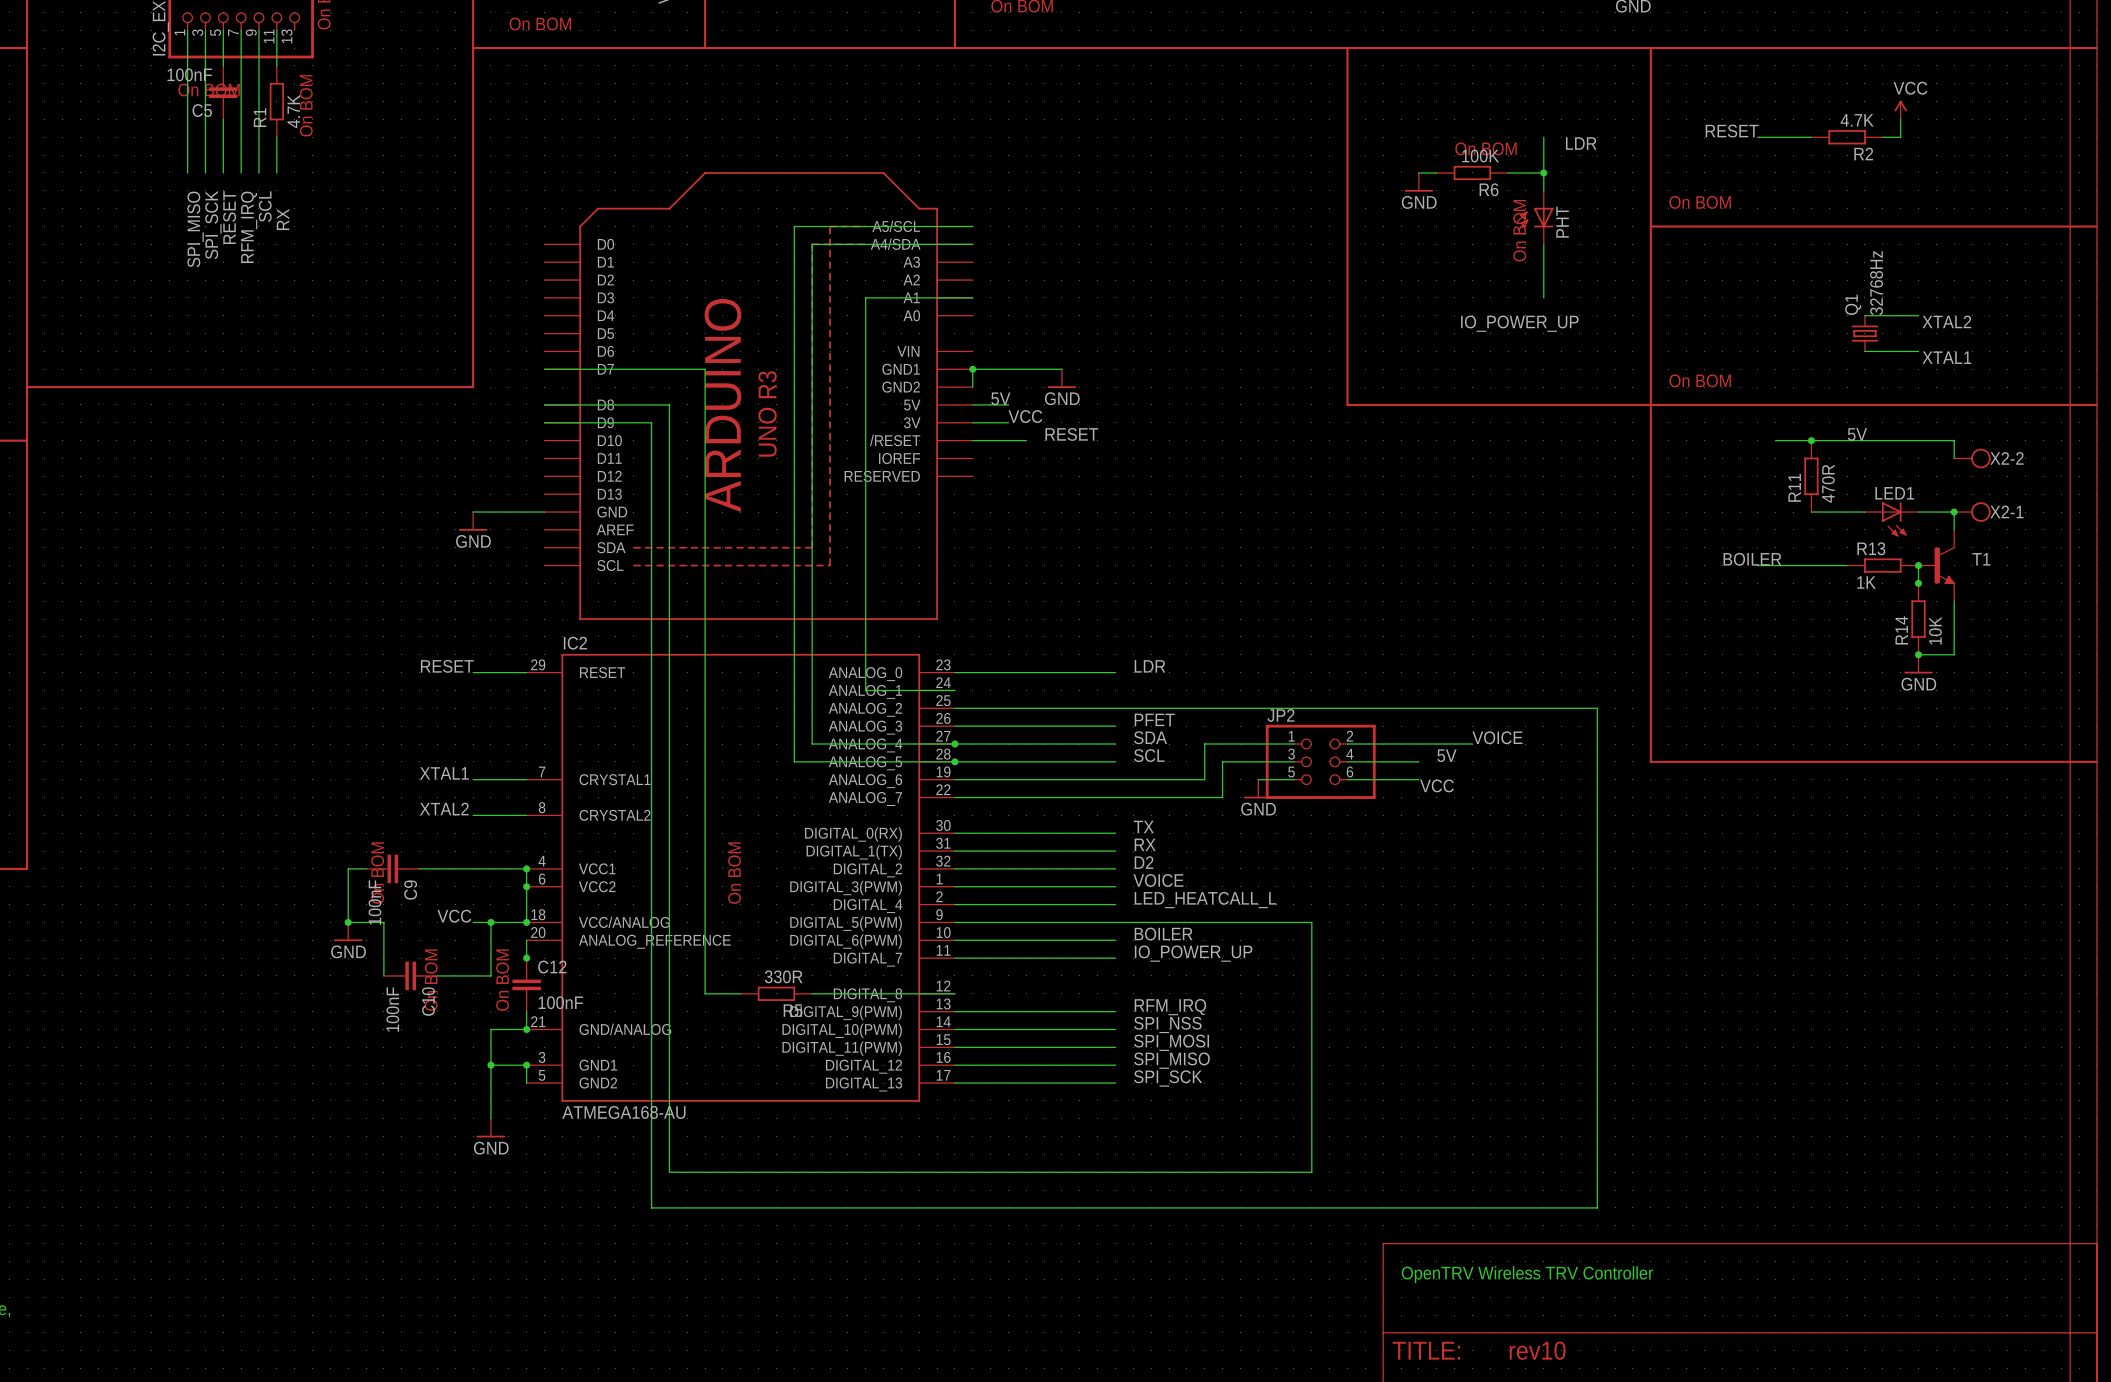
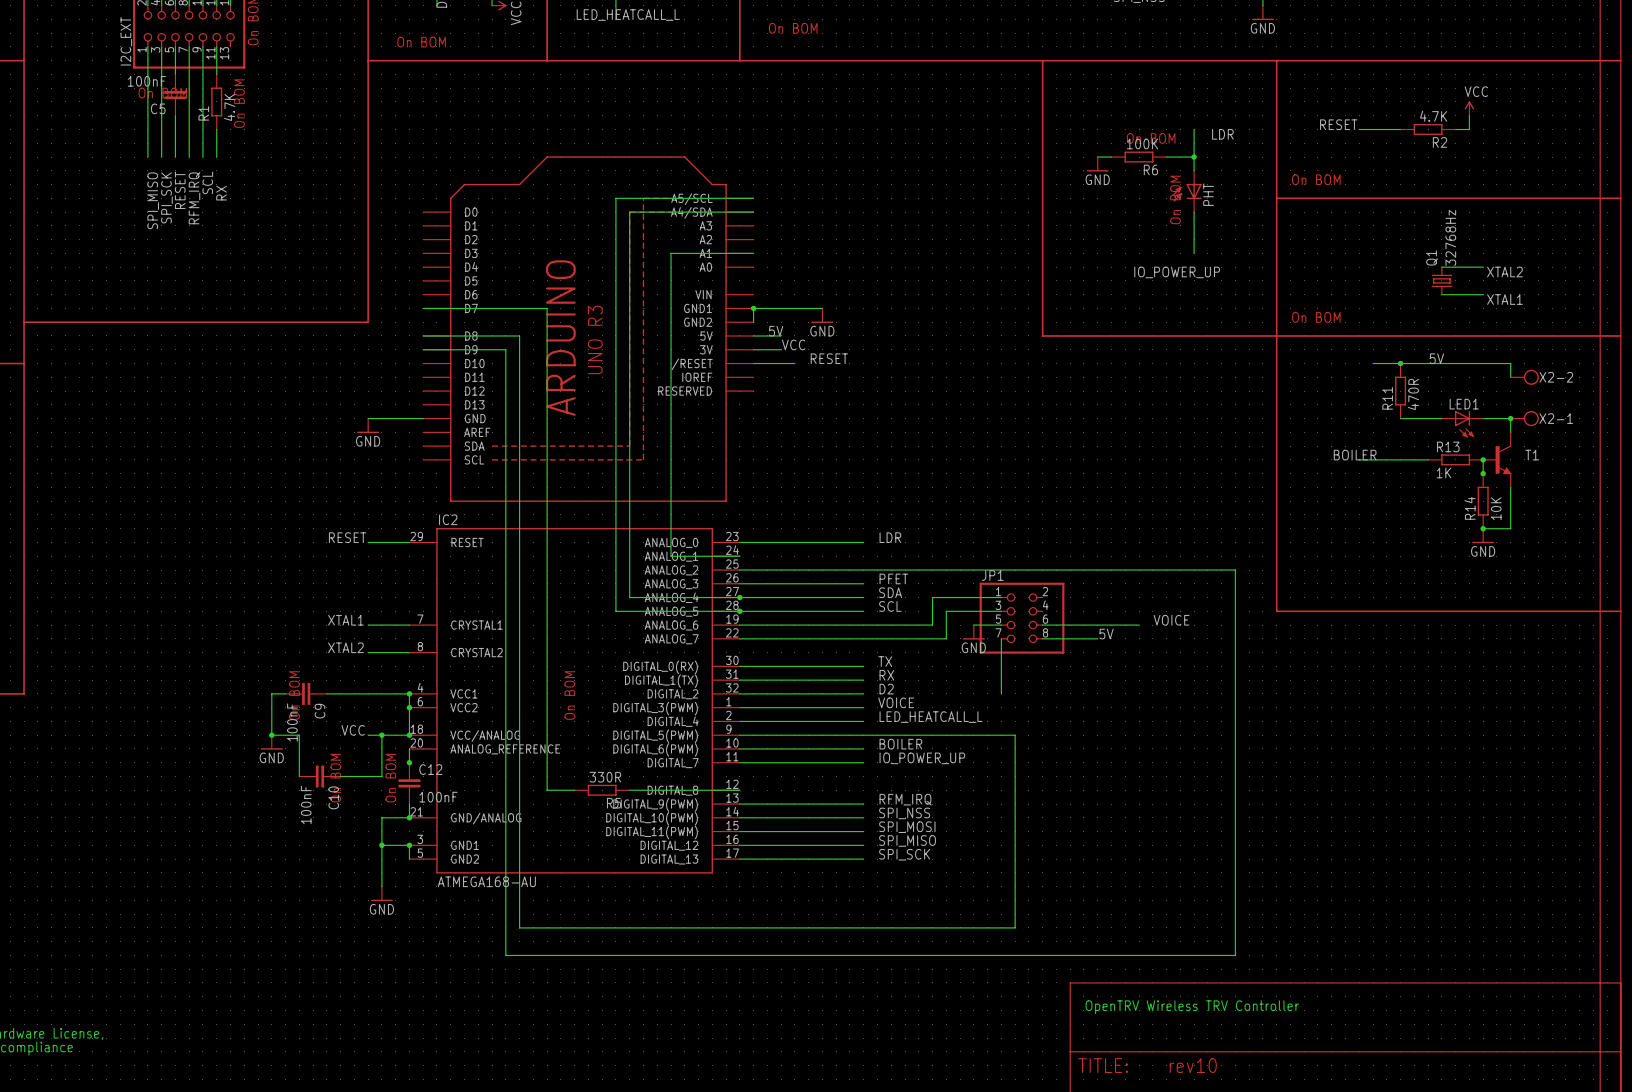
label position: VOICE (1497, 737) -> VOICE (1171, 620)
wire: (1347, 744) (1472, 744) -> none
label position: 5V (1446, 755) -> 5V (1106, 634)
JP2: (1320, 761) -> none
wire: (1347, 761) (1418, 761) -> (1042, 638) (1097, 638)
JP1: none -> (1022, 618)
wire: none -> (1097, 625) (1139, 625)
label: VCC (1437, 785) -> none
wire: none -> (1001, 638) (1001, 693)

